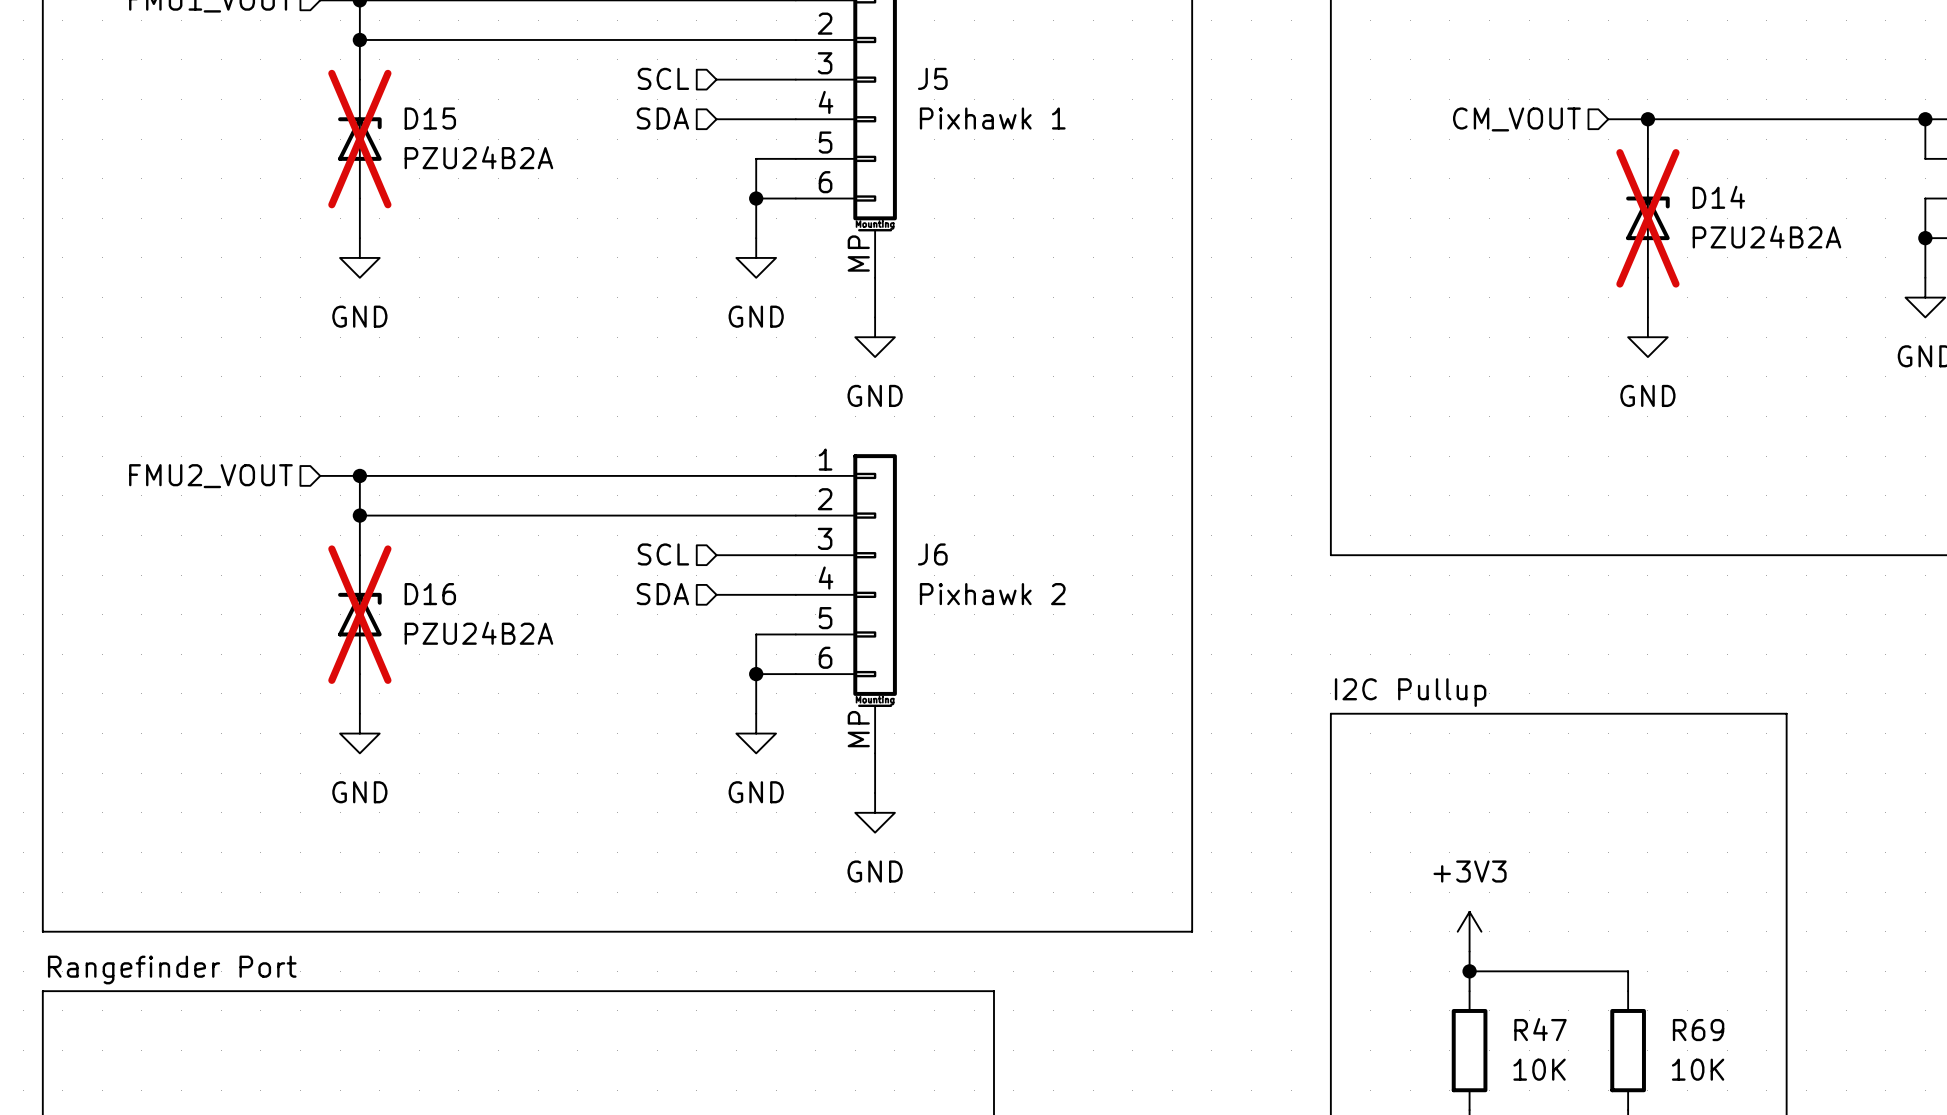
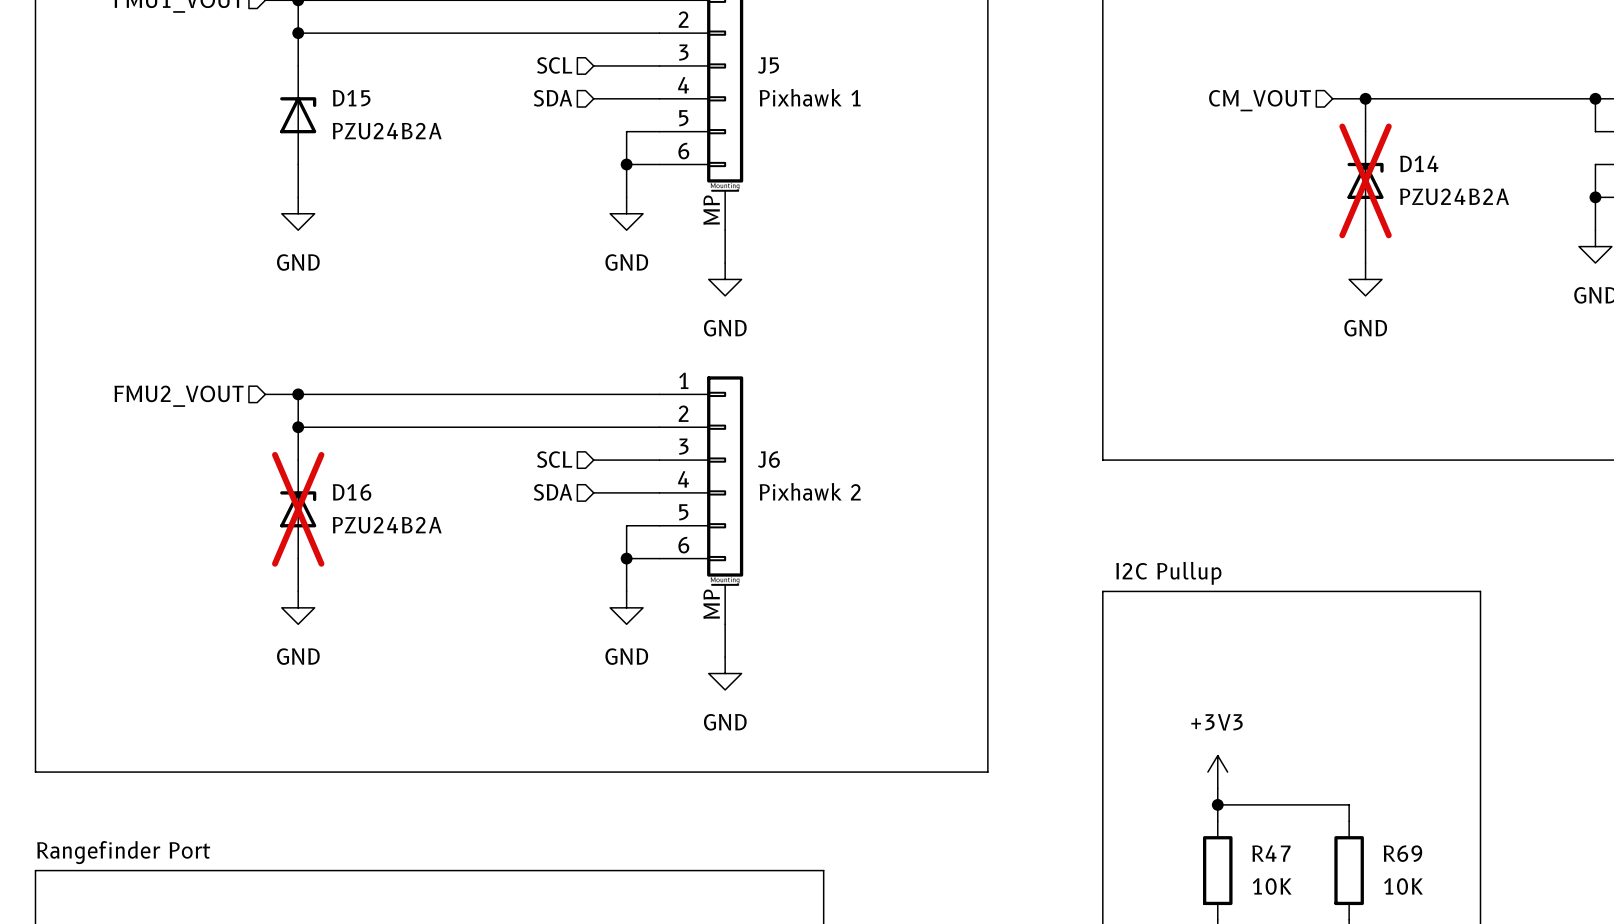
D15 do-not-place cross: (359, 139) -> none
text position: Rangefinder Port (172, 970) -> Rangefinder Port (123, 852)
line: (42, 1050) (42, 991) (993, 991) (993, 1050) -> (35, 870) (823, 870)

